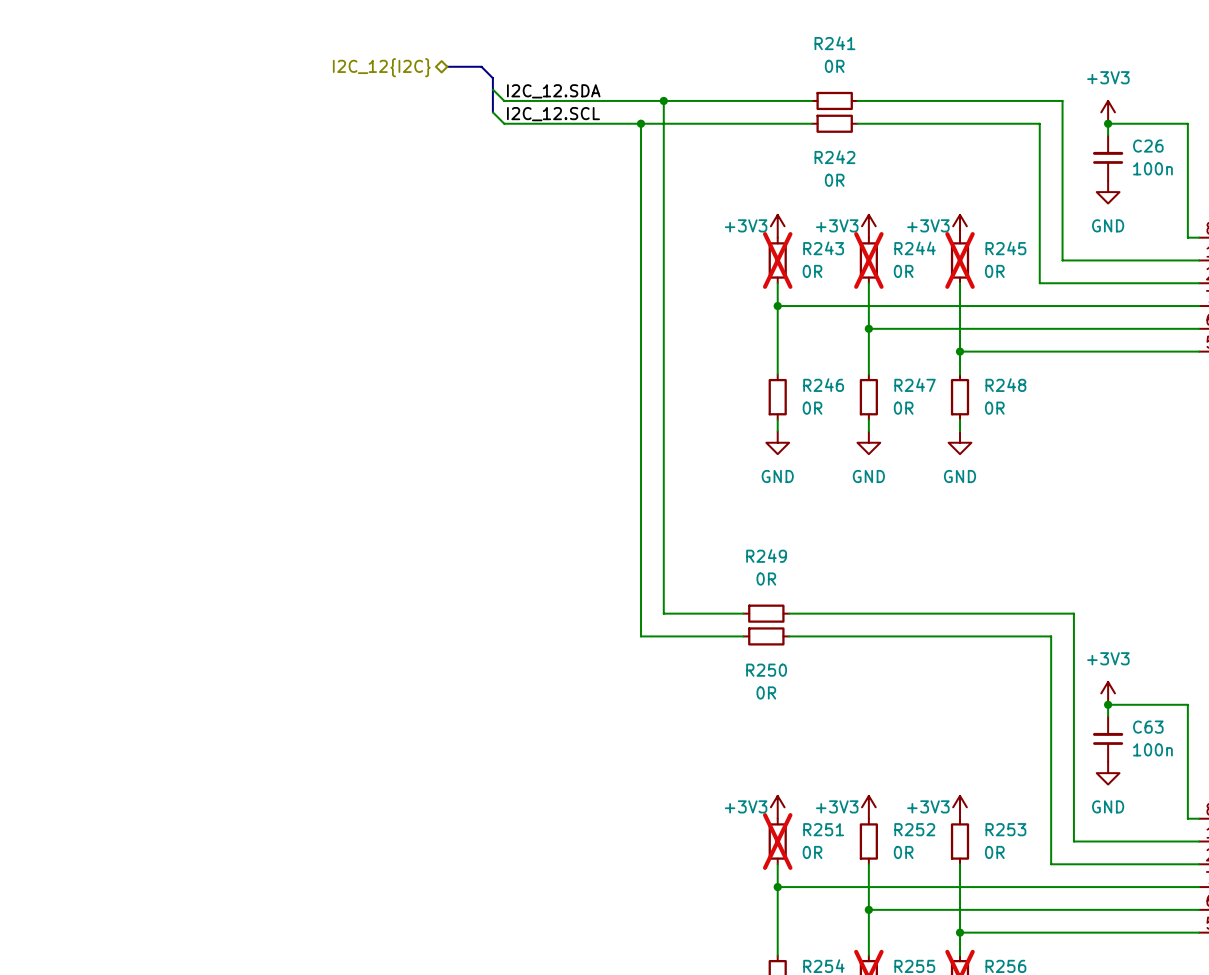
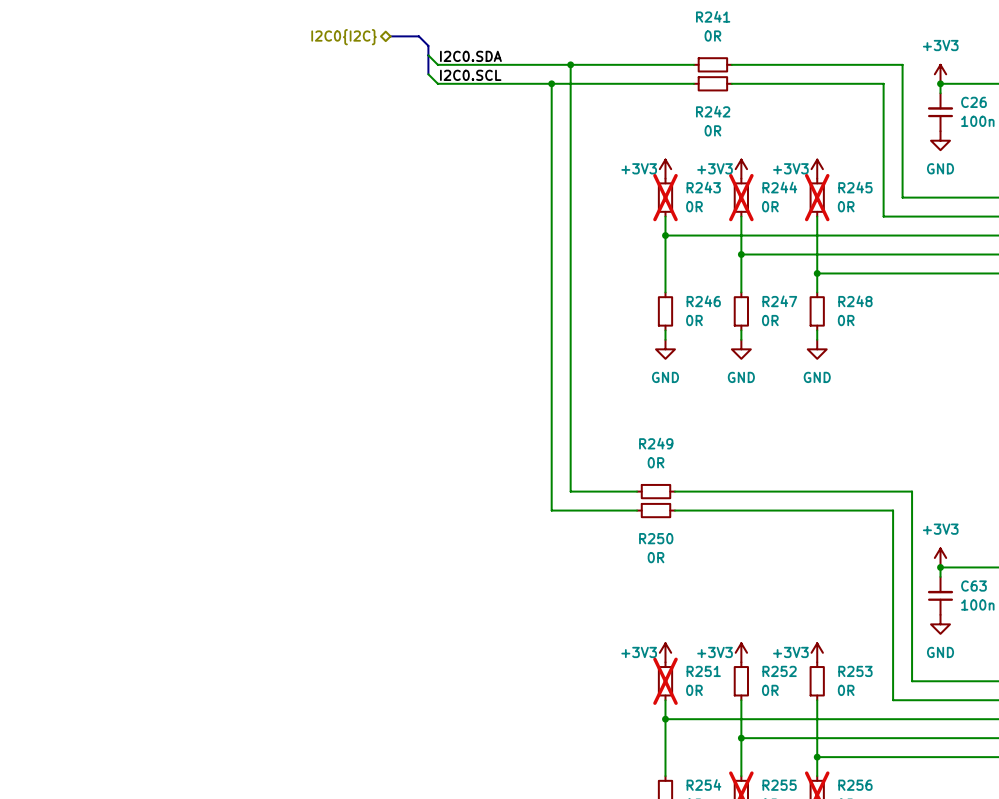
hierarchical label: I2C_12{I2C} (381, 67) -> I2C0{I2C} (344, 37)
label: I2C_12.SDA (553, 91) -> I2C0.SDA (470, 56)
label: I2C_12.SCL (553, 114) -> I2C0.SCL (470, 75)

